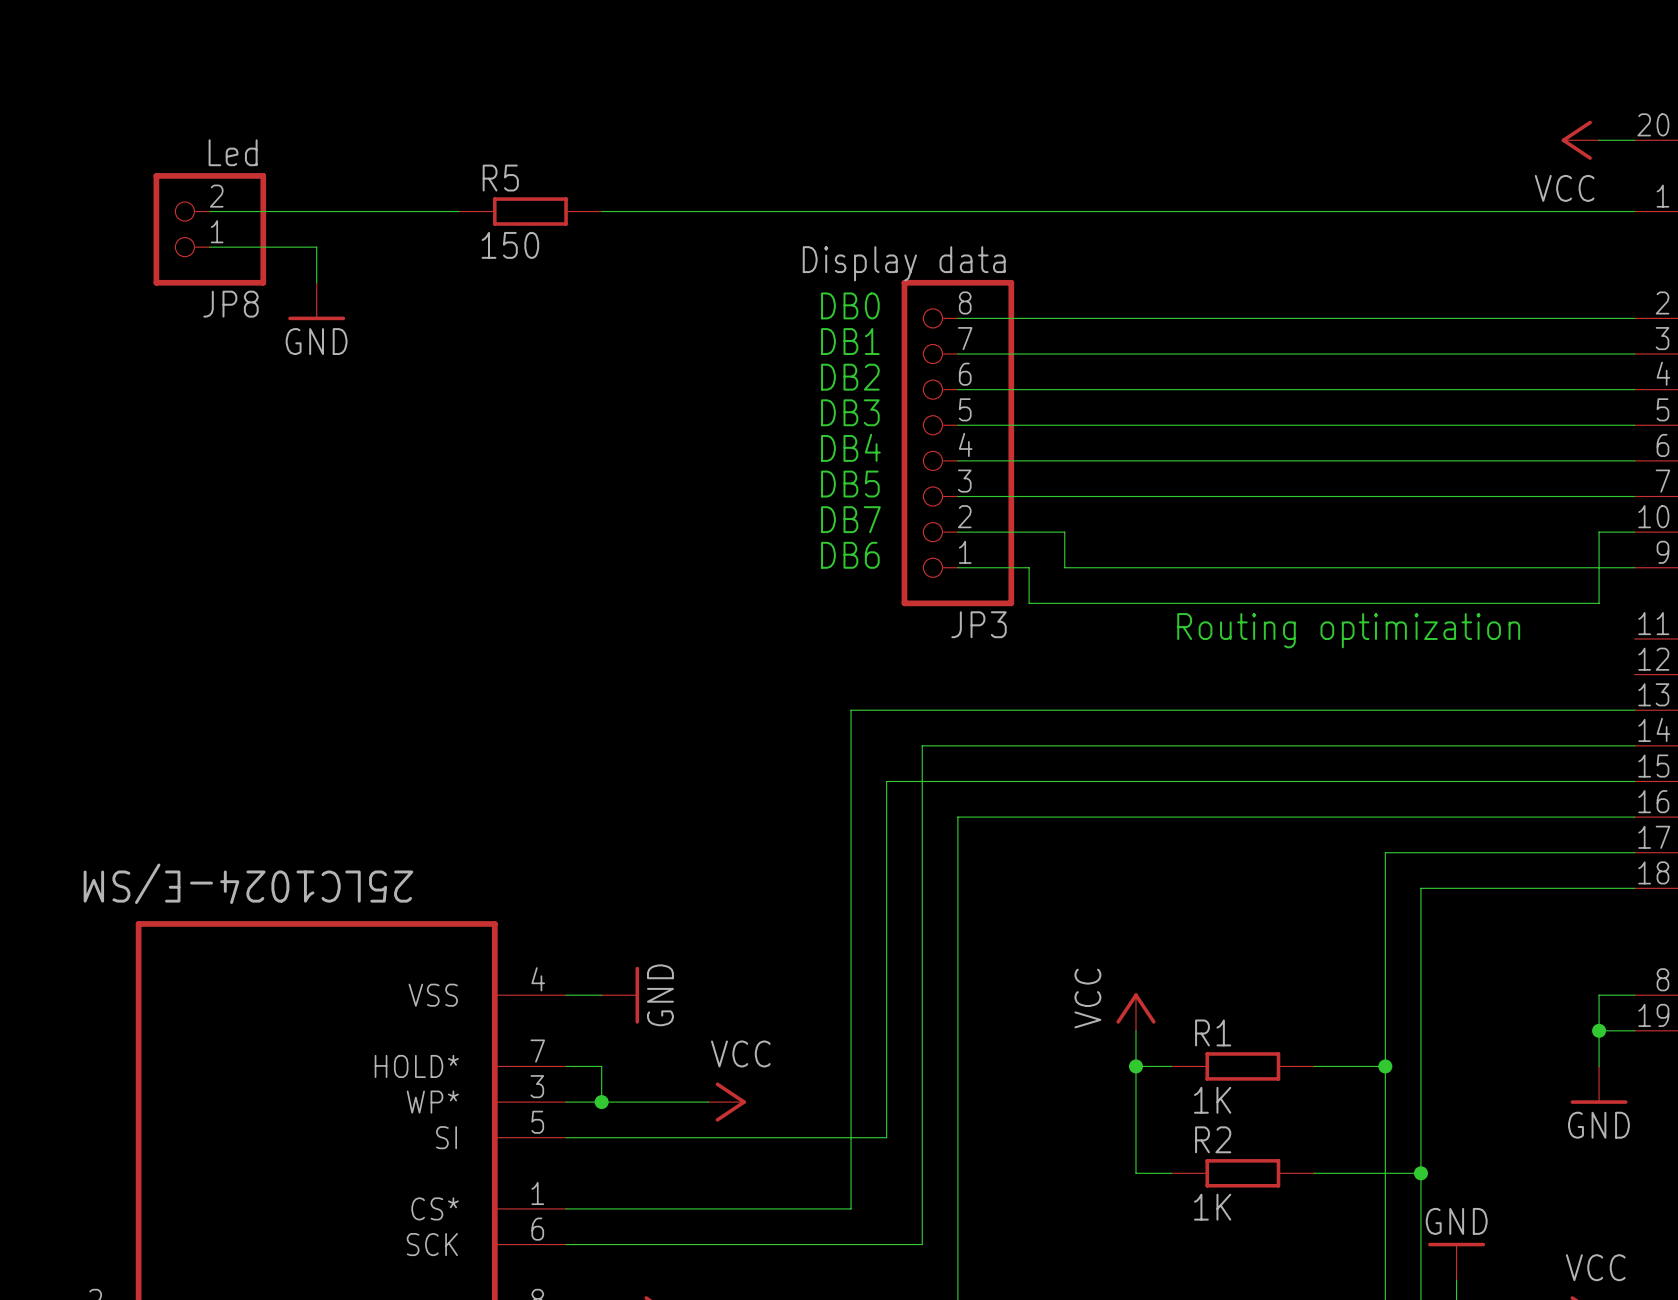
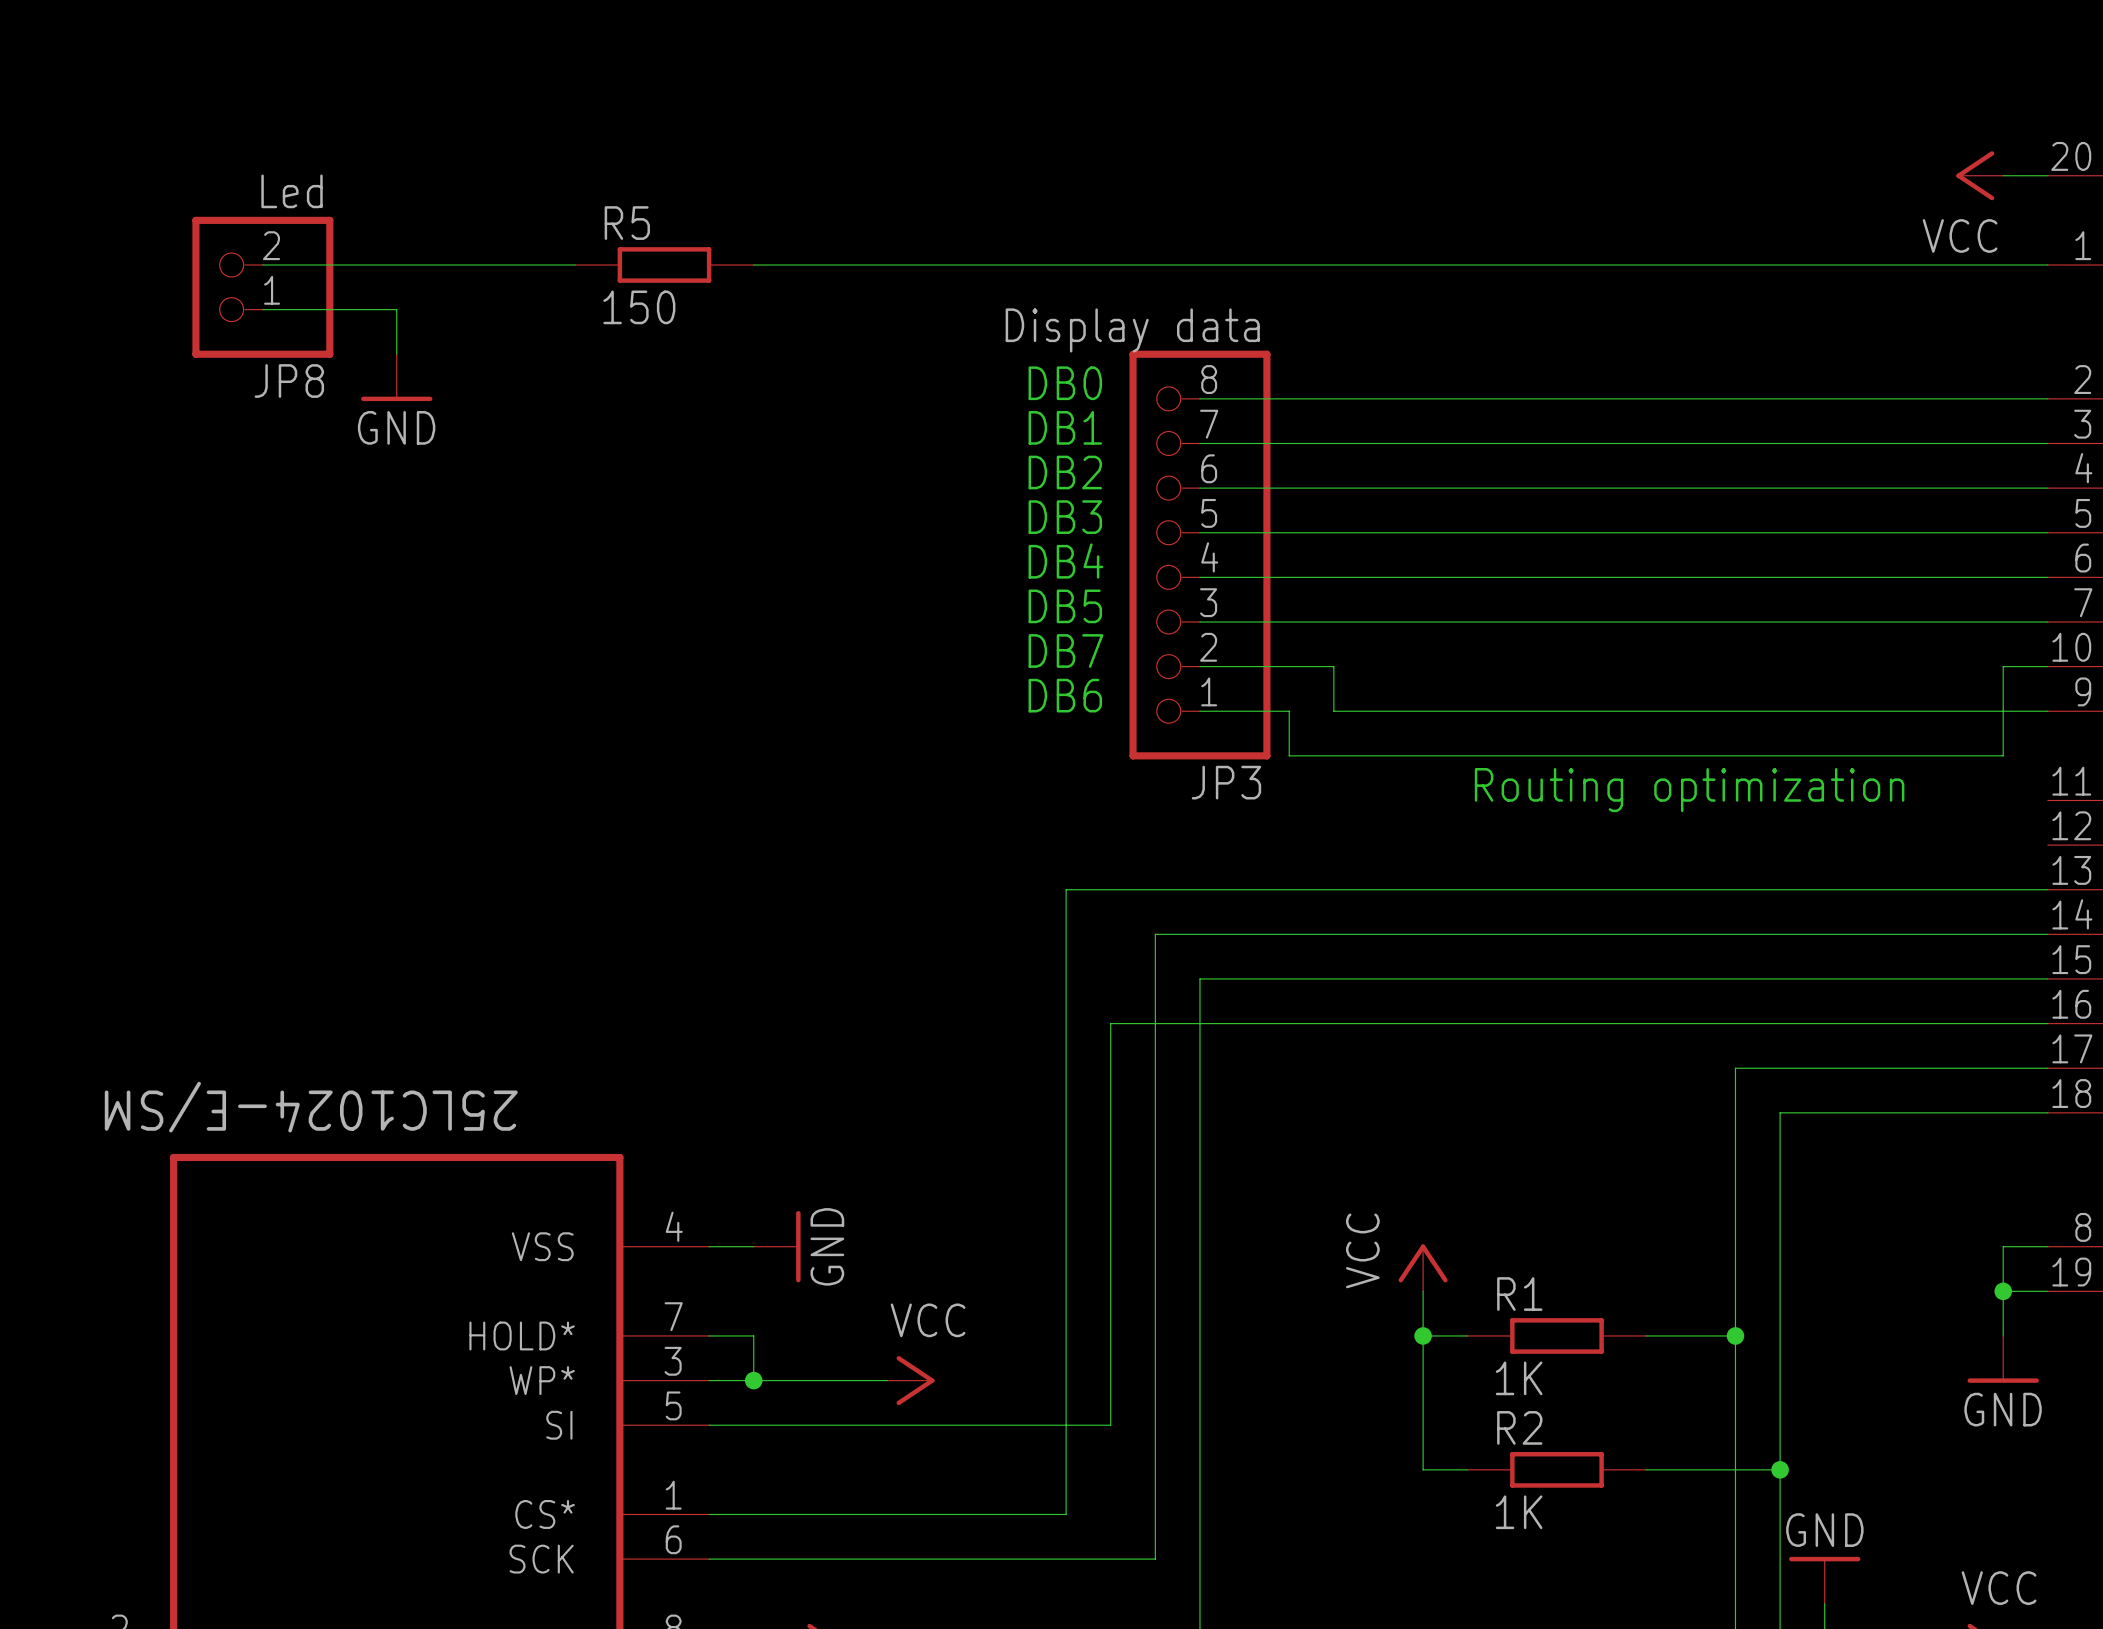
wire: (957, 781) (886, 781) (886, 817) -> (1199, 978) (1199, 1023) (1110, 1023)

